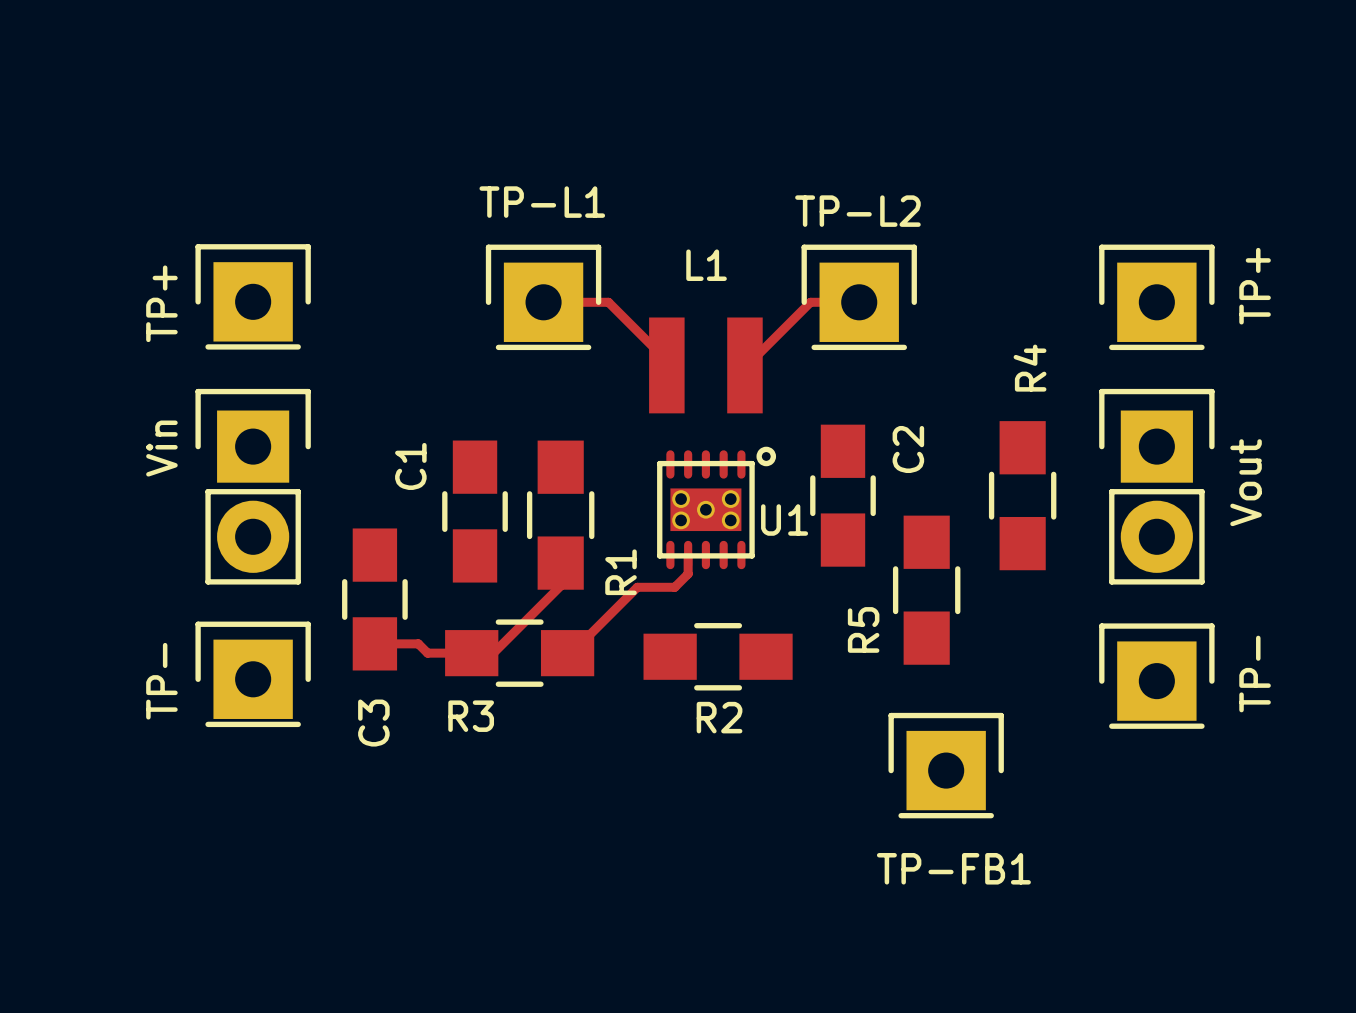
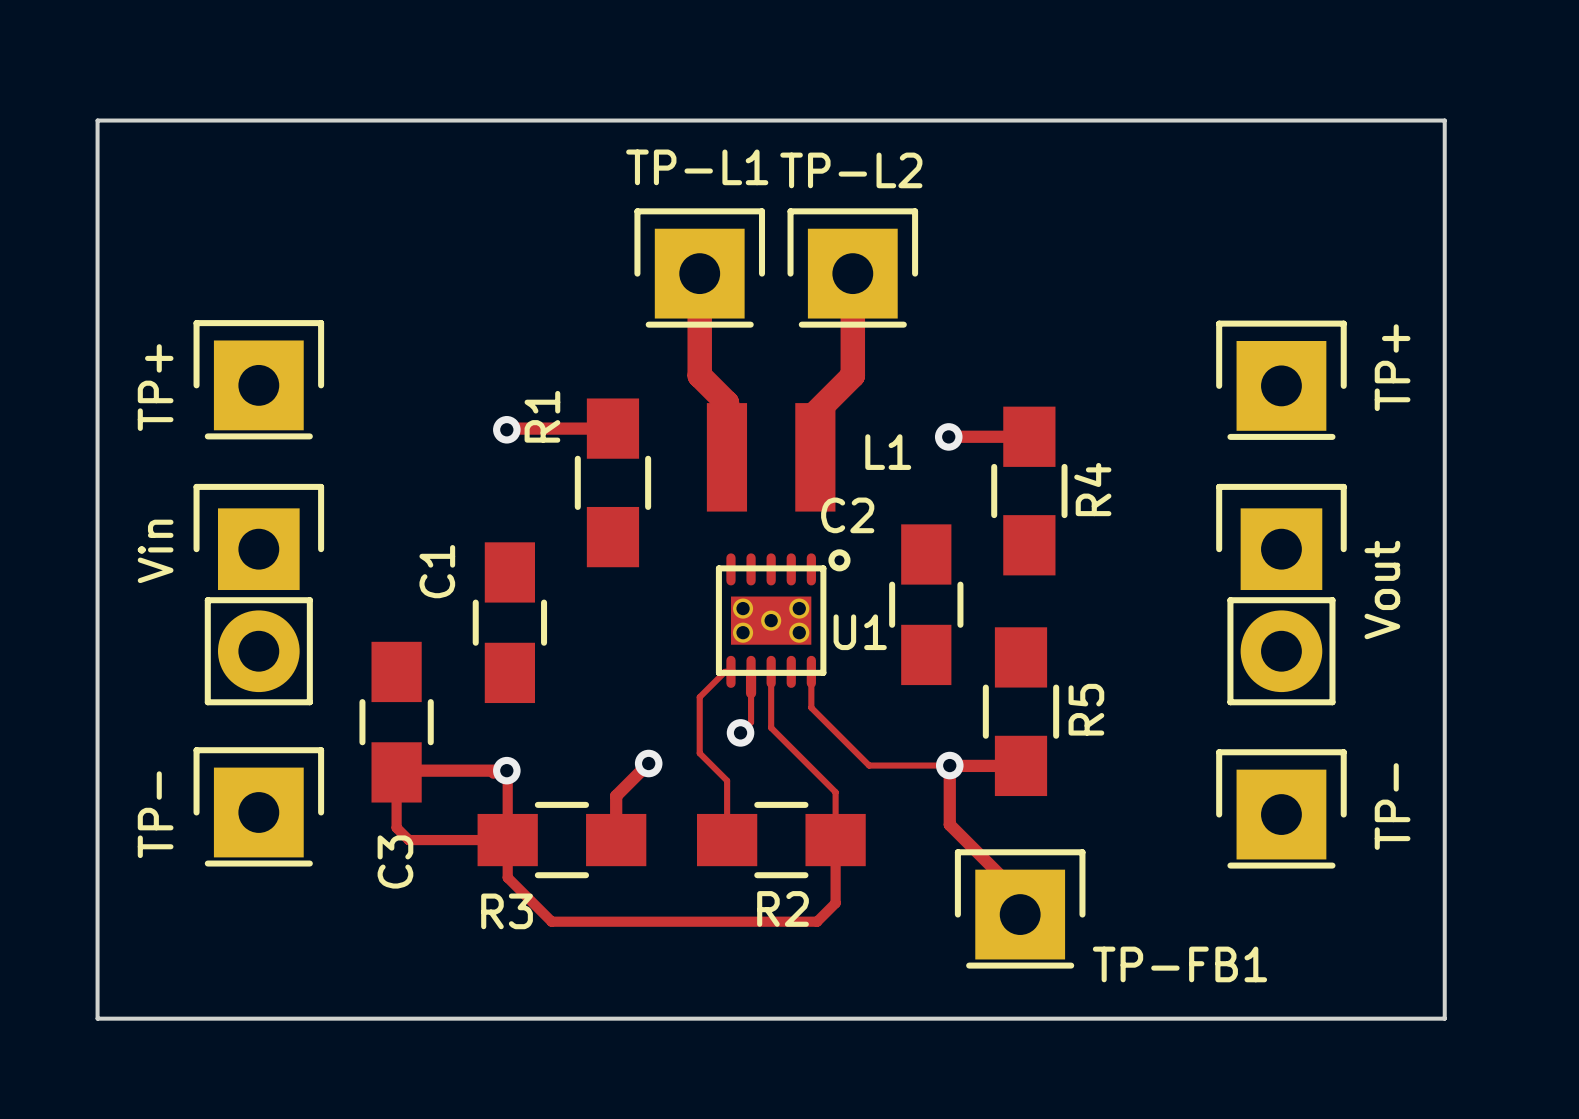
board edge: none -> (97, 120) (97, 1018) (1444, 1018) (1444, 120) (97, 120)
TP-L1 name position: TP-L1 (542, 202) -> TP-L1 (697, 167)
track: none -> (699, 273) (699, 375) (726, 402) (726, 457) (725, 455)
track: none -> (852, 273) (852, 375) (815, 413) (815, 457)
L1 name position: L1 (706, 265) -> L1 (888, 452)
TP-L1 position: (543, 297) -> (699, 268)
TP-L2 position: (859, 297) -> (852, 268)
track: (543, 302) (608, 302) (666, 360) -> none
track: (859, 302) (810, 302) (747, 365) -> none
track: none -> (612, 428) (506, 429)
via: none -> (506, 429)
track: none -> (948, 436) (1029, 436)
via: none -> (948, 436)
R4 name position: R4 (1030, 368) -> R4 (1092, 489)
C2 name rotation: 0° (908, 449) -> 90° clockwise (847, 515)
C2 name position: C2 (908, 449) -> C2 (847, 515)
R4 position: (1022, 495) -> (1029, 491)
R1 position: (560, 515) -> (612, 482)
track: none -> (730, 671) (725, 671) (699, 697) (699, 753) (727, 780) (727, 840)
track: none -> (771, 671) (771, 727) (835, 792) (835, 903) (817, 921) (551, 921) (507, 877) (507, 770) (505, 768) (506, 770) (398, 770) (396, 772) (396, 827) (408, 840) (507, 840)
track: none -> (811, 671) (811, 707) (869, 765) (949, 765) (949, 824) (1020, 895) (1020, 914)
track: (560, 563) (560, 585) (493, 653) (427, 653) (418, 643) (374, 643) -> none
R1 name position: R1 (621, 572) -> R1 (542, 416)
track: (688, 573) (674, 587) (637, 587) (571, 653) (567, 653) -> (751, 693) (751, 722) (740, 732)
via: none -> (740, 732)
R5 name position: R5 (863, 629) -> R5 (1086, 709)
track: none -> (648, 763) (616, 796) (616, 840)
via: none -> (648, 763)
via: none -> (949, 765)
track: none -> (950, 765) (1021, 765)
via: none -> (506, 770)
R3 position: (519, 653) -> (561, 840)
R2 position: (718, 656) -> (781, 840)
TP-FB1 position: (946, 765) -> (1020, 908)
TP-FB1 name position: TP-FB1 (953, 868) -> TP-FB1 (1179, 964)

